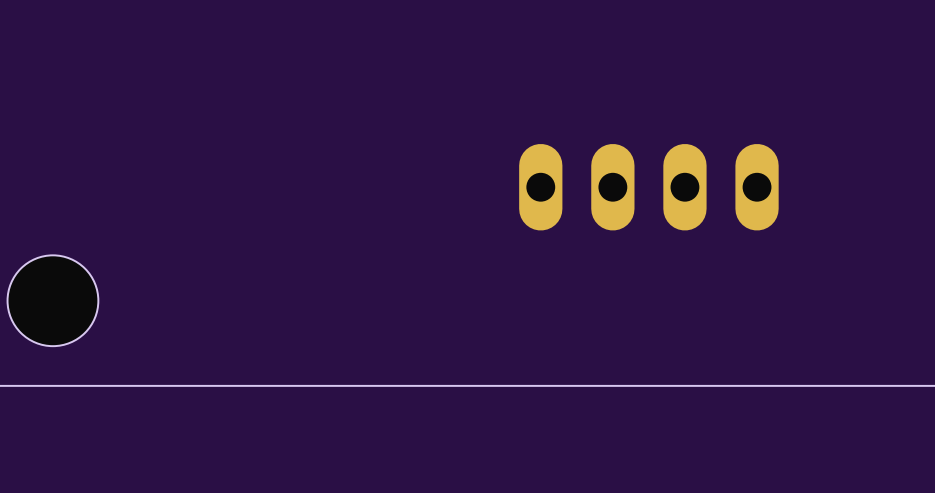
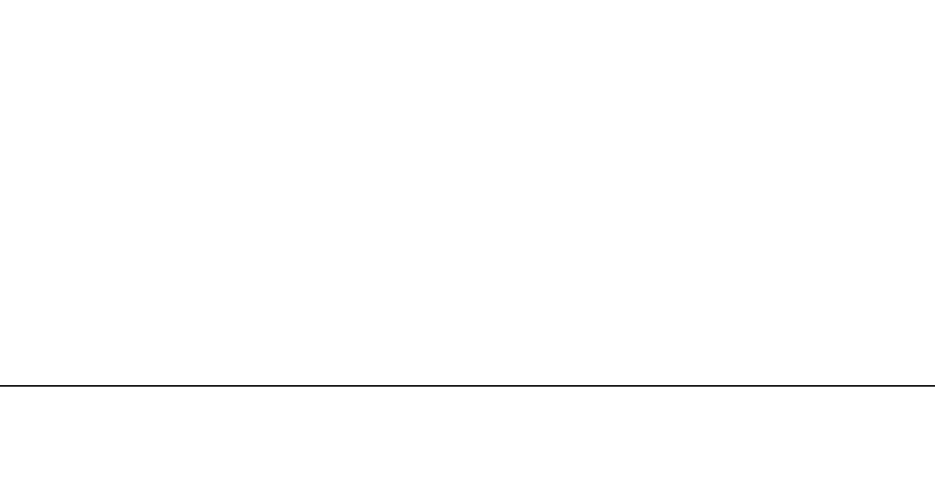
part: (648, 187) -> none
hole: (52, 300) -> none

